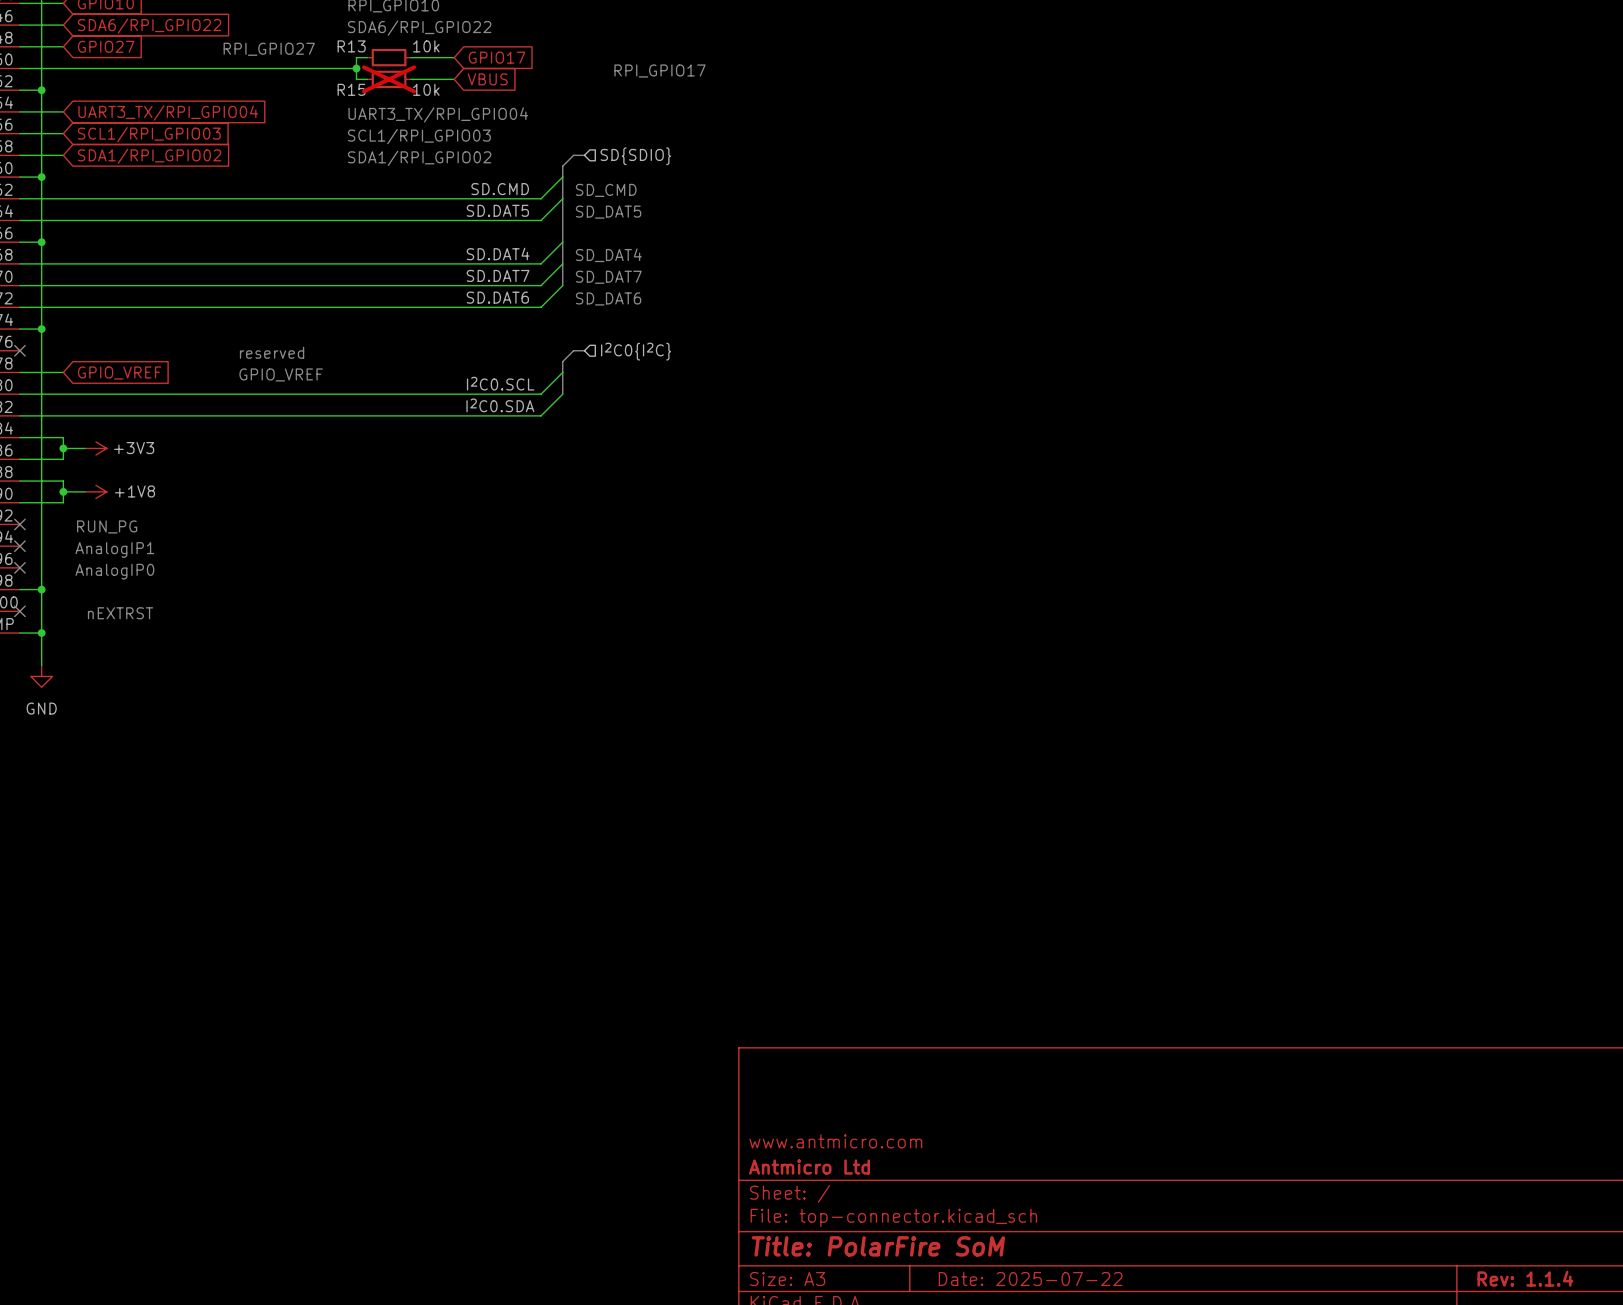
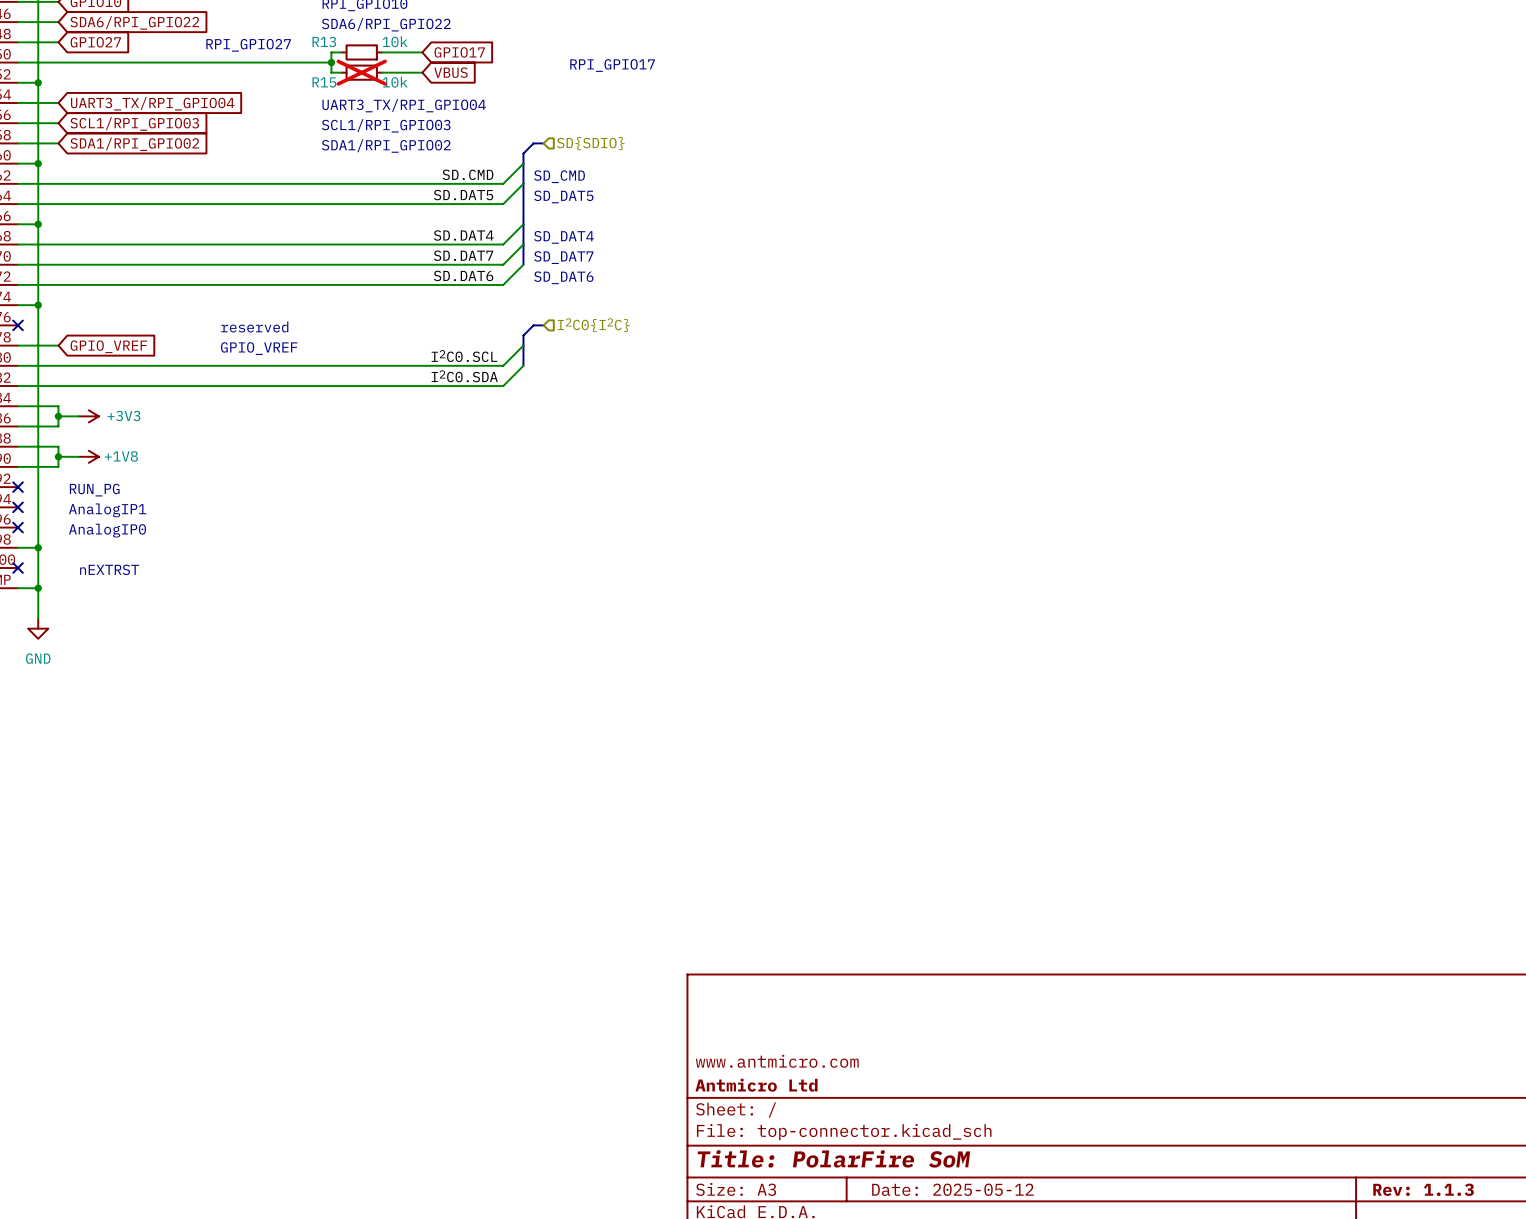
title block: Rev: 1.1.4 (1525, 1278) -> Rev: 1.1.3 (1423, 1189)
title block: Date: 2025-07-22 (1030, 1279) -> Date: 2025-05-12 (952, 1189)

